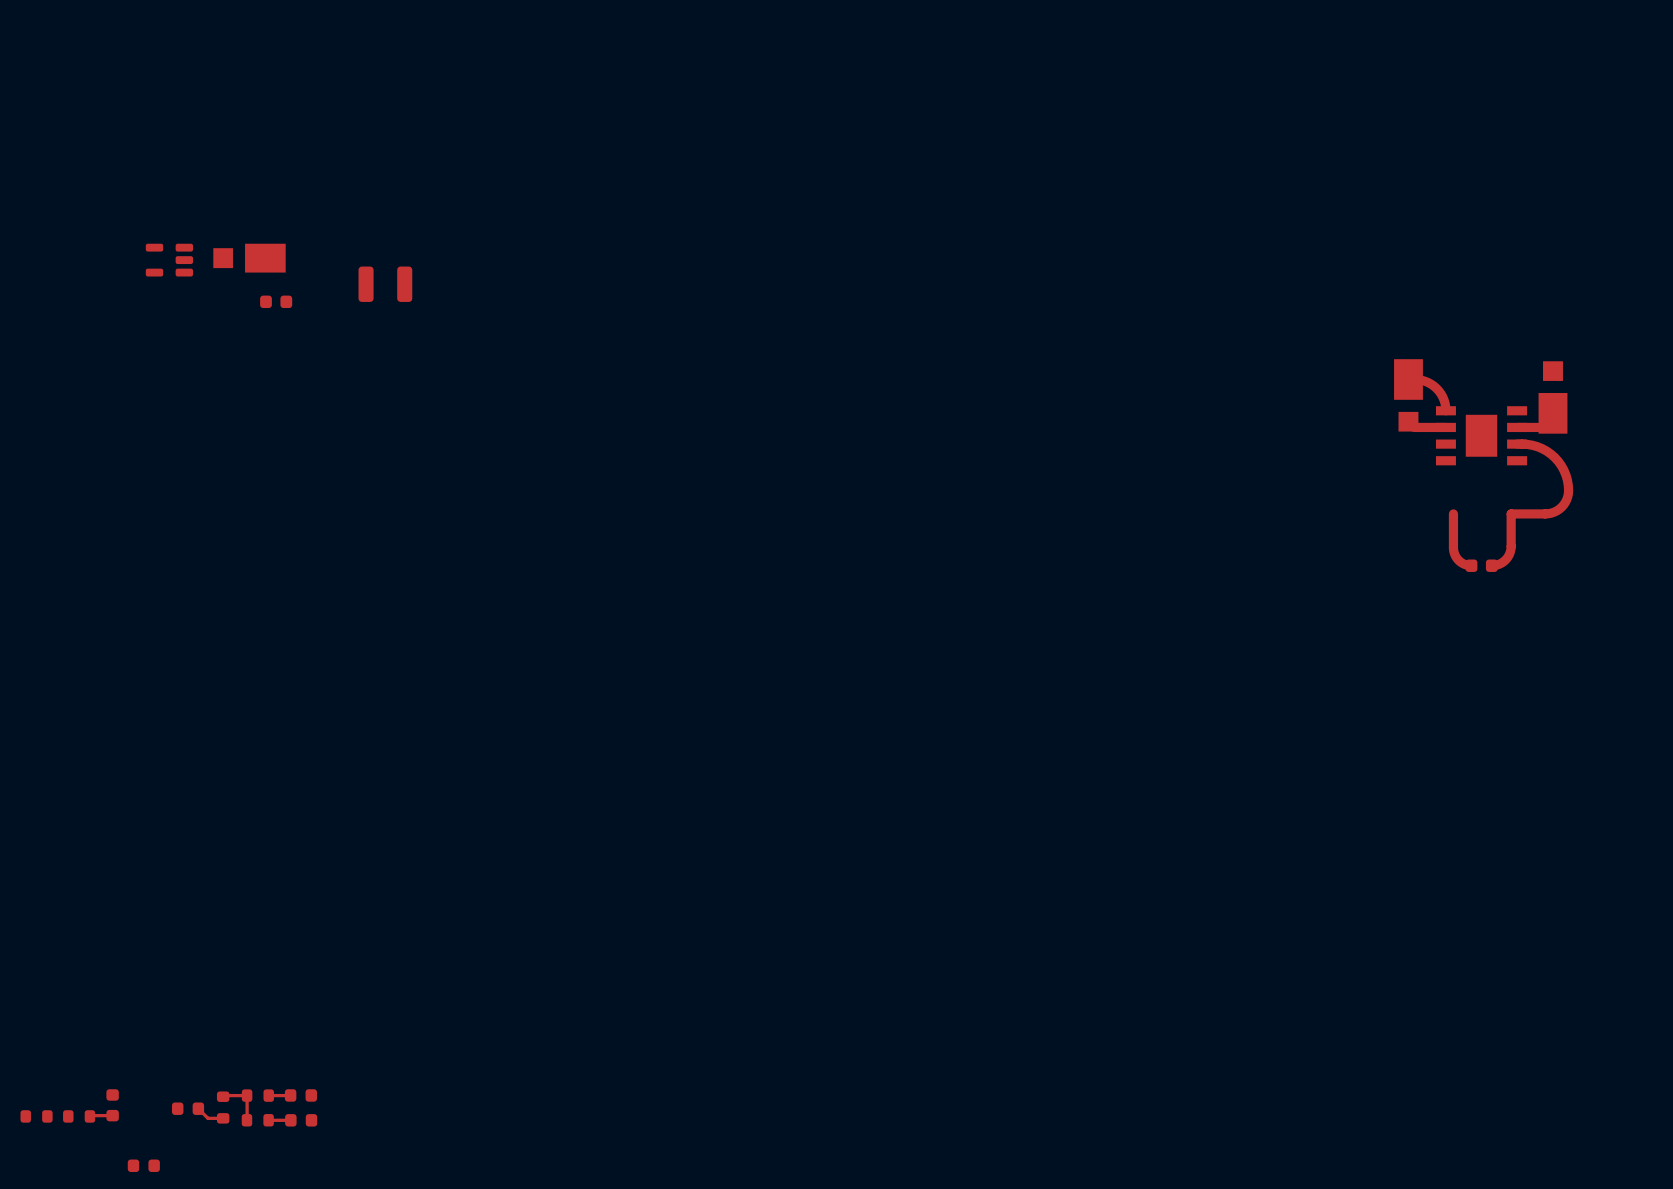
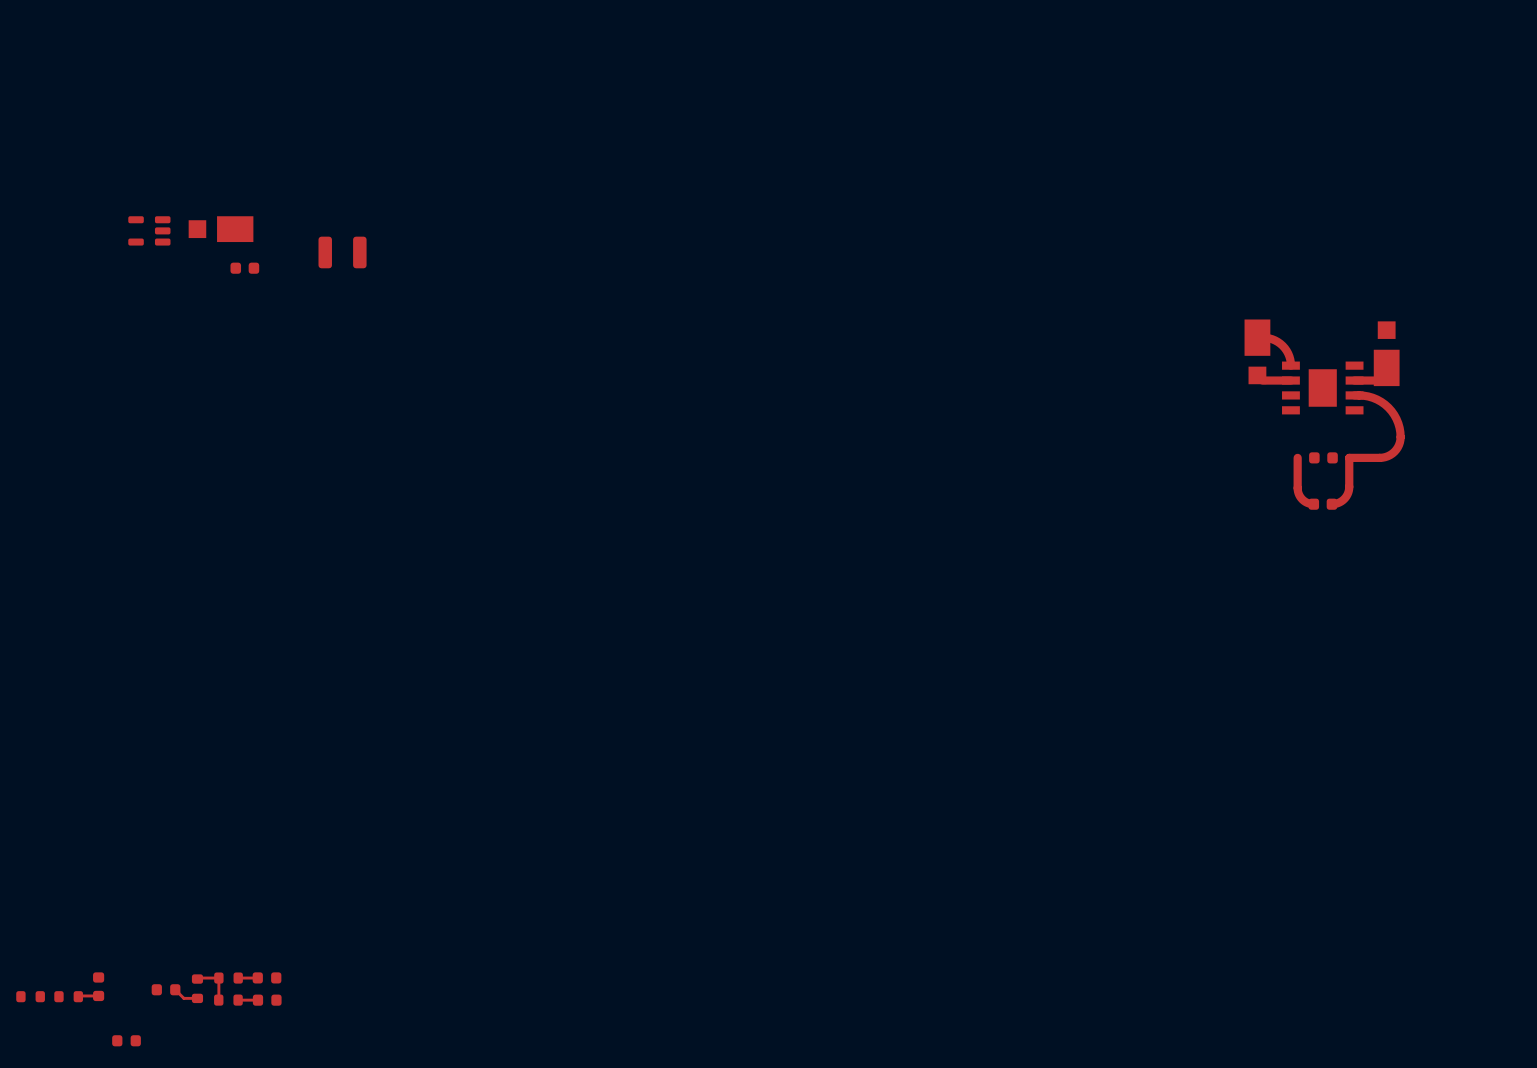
part: none -> (1323, 457)

